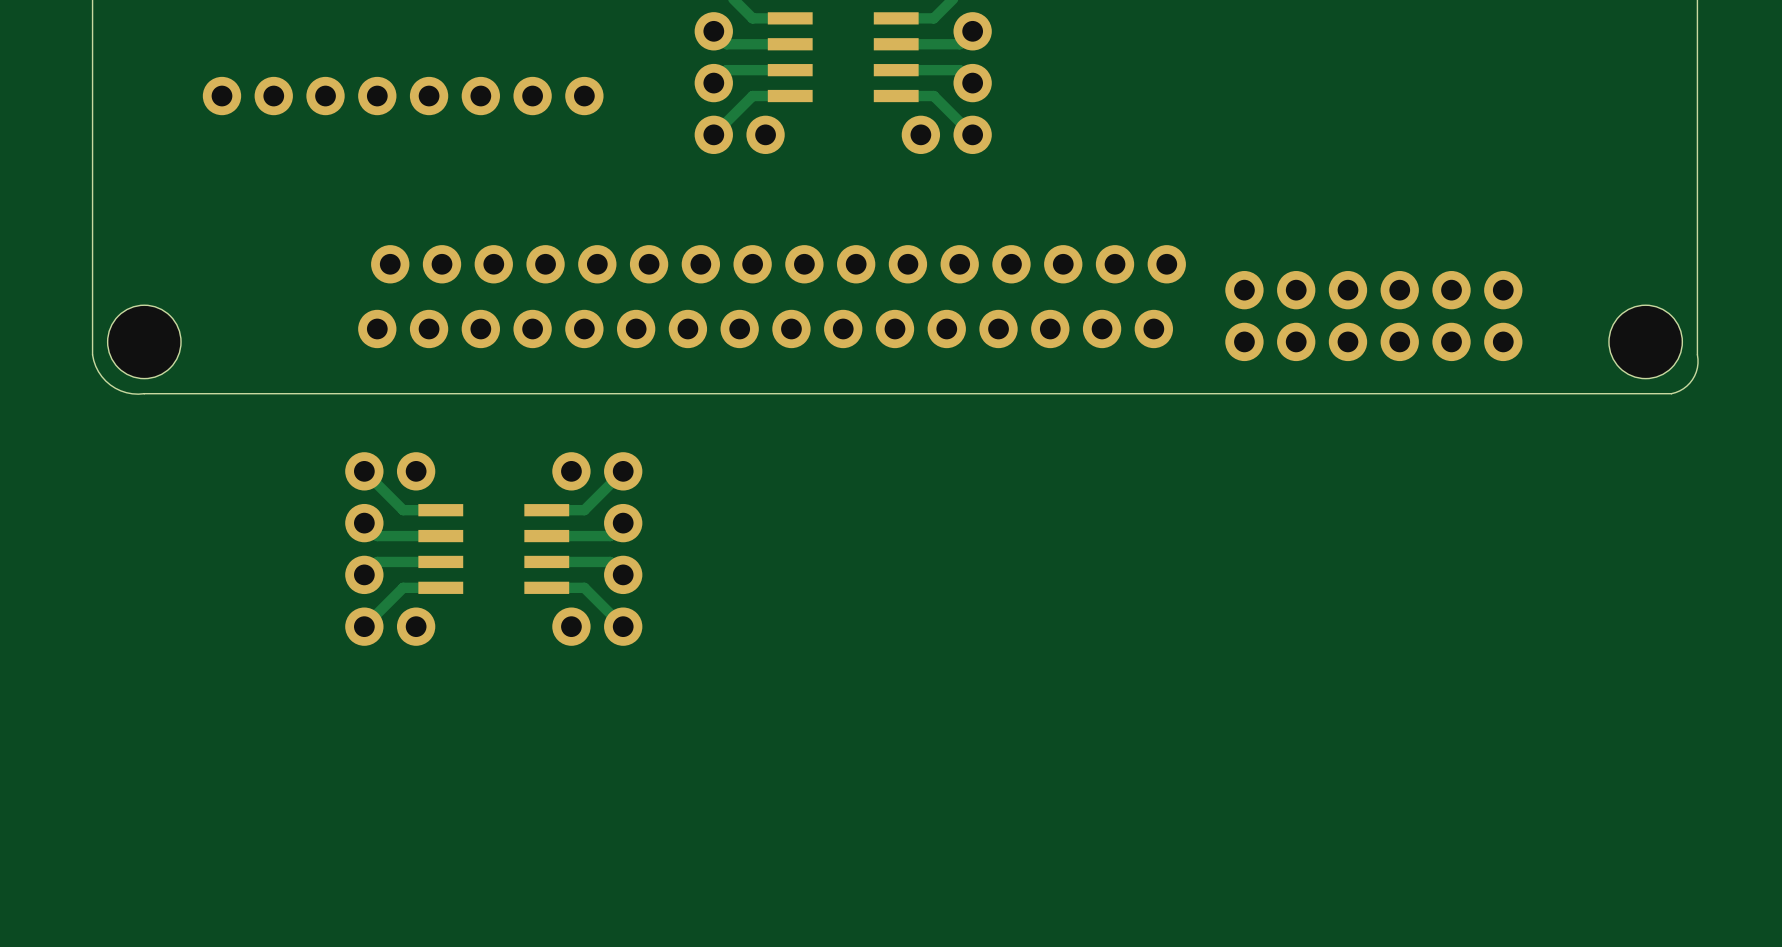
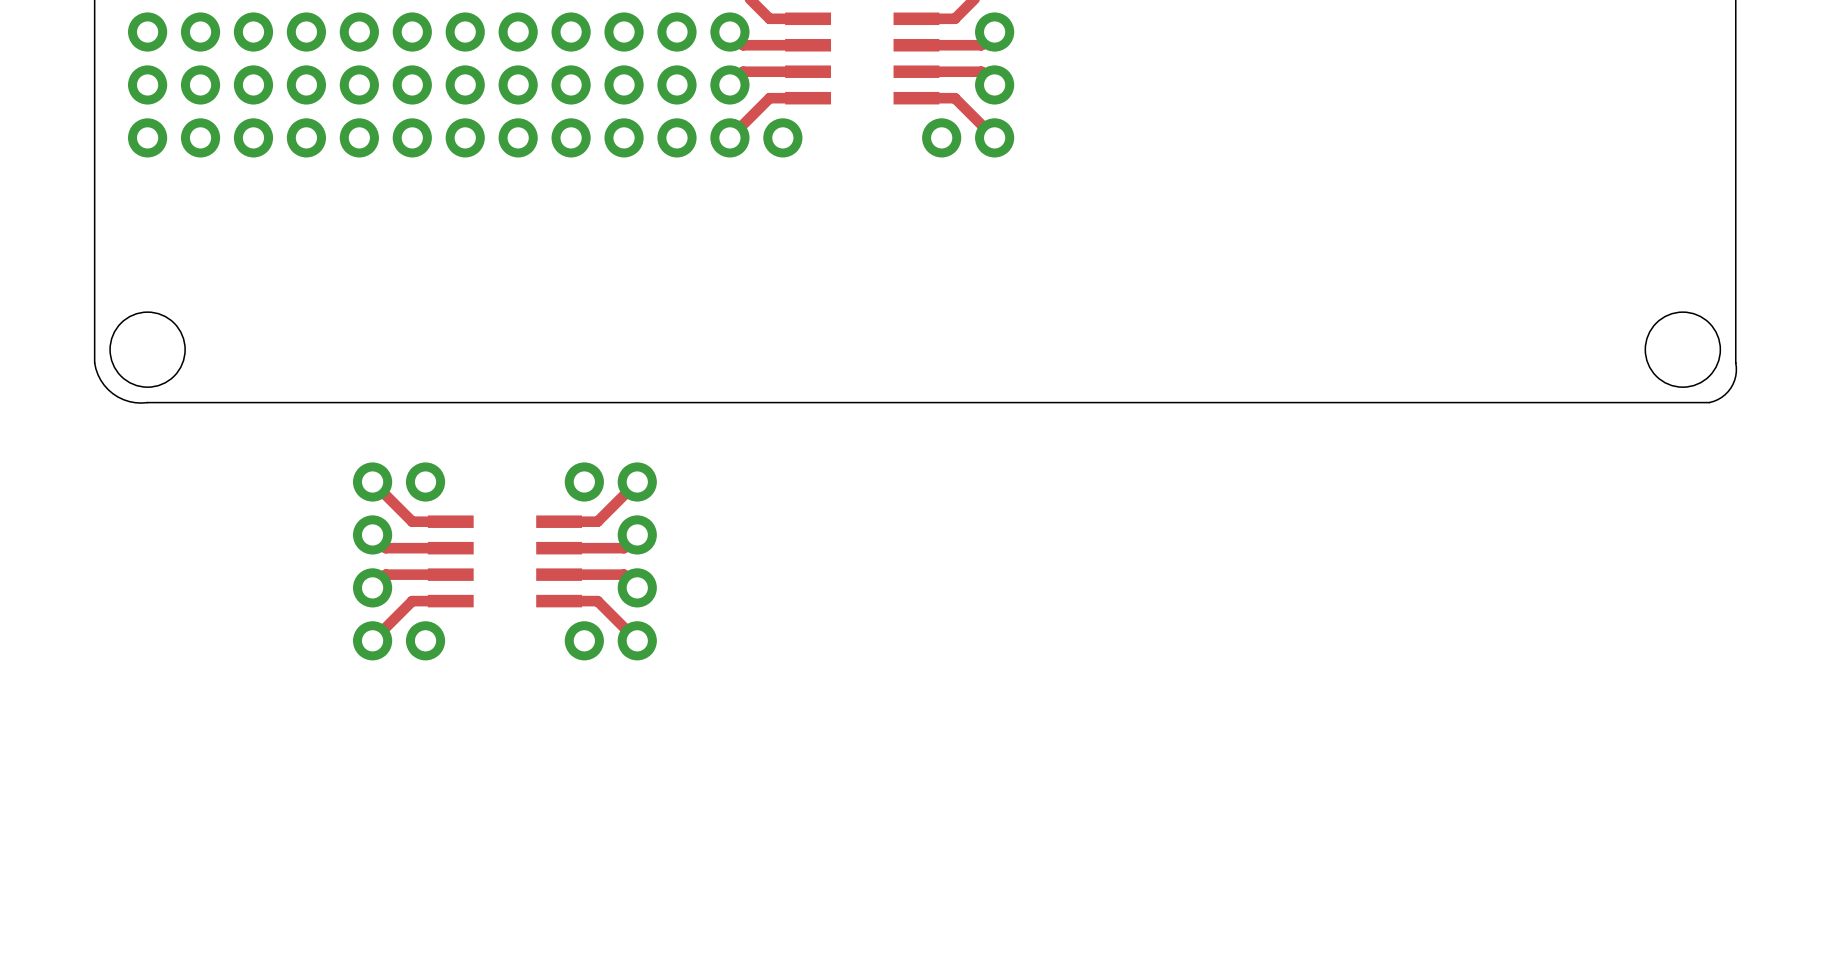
part: none -> (412, 32)
part footprint: [202, 76, 604, 116] -> [128, 65, 697, 105]
part: none -> (412, 137)
part: (778, 264) -> none
part: (1373, 316) -> none
part: (765, 328) -> none

